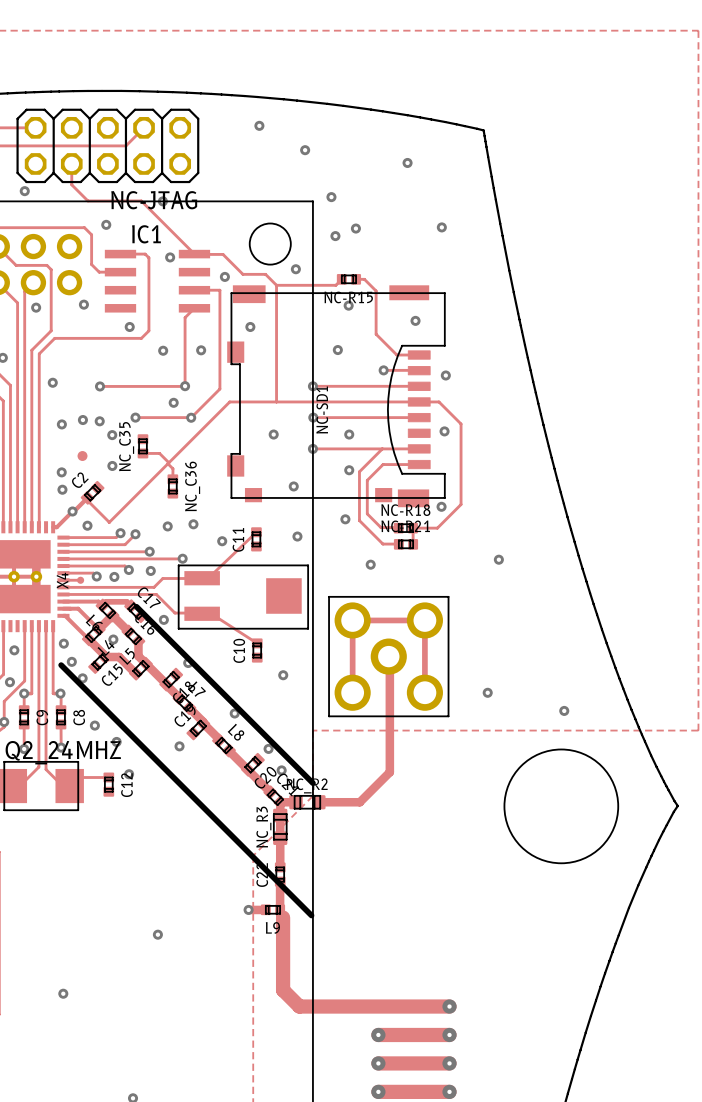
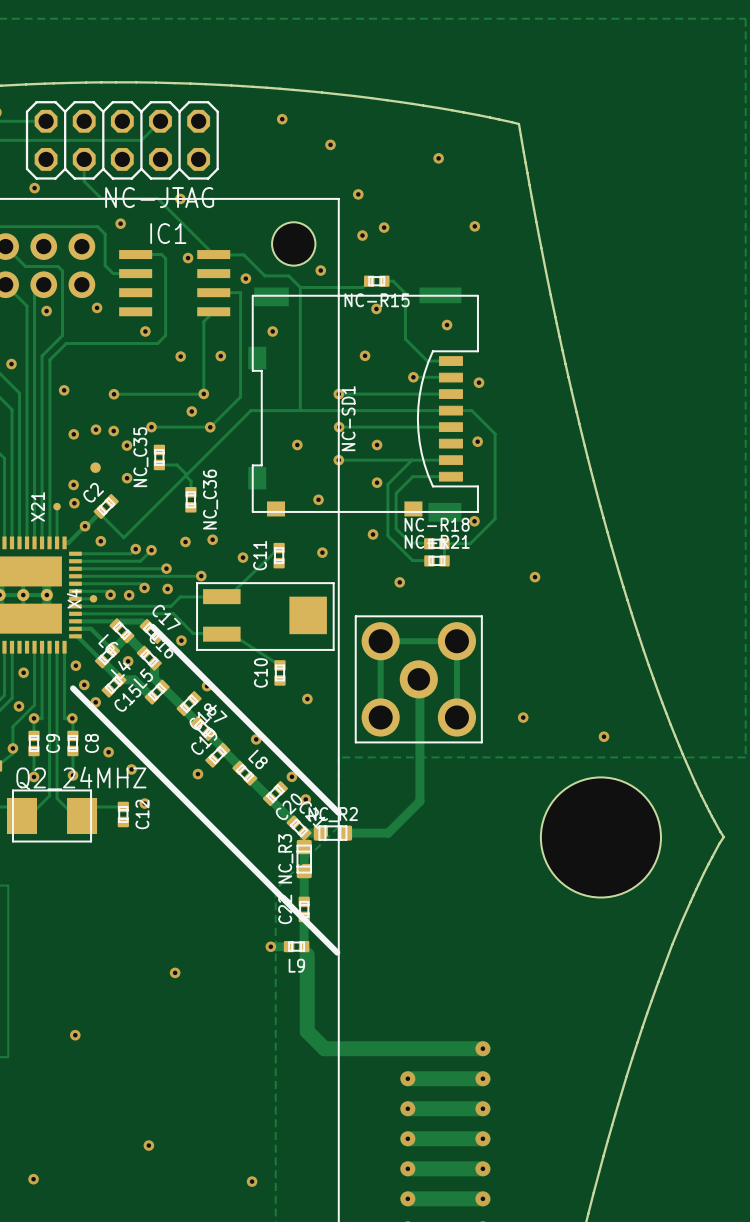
track: none -> (57, 506) (57, 542)
X21: none -> (57, 506)

